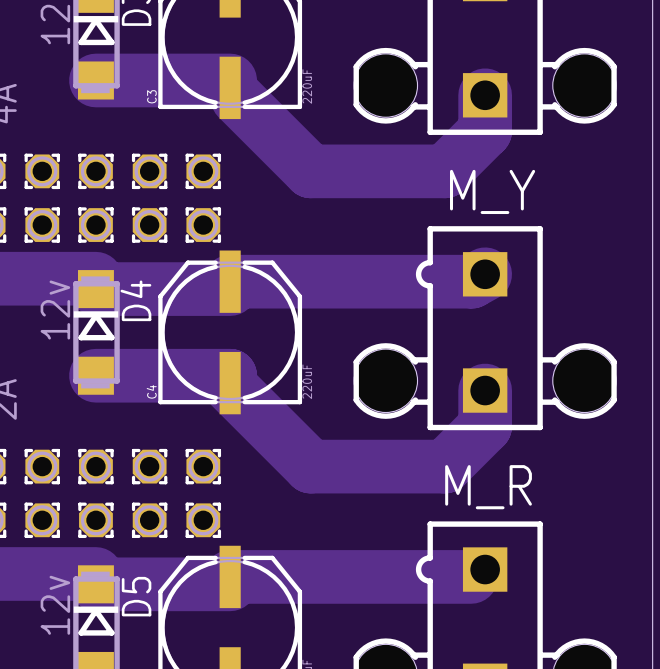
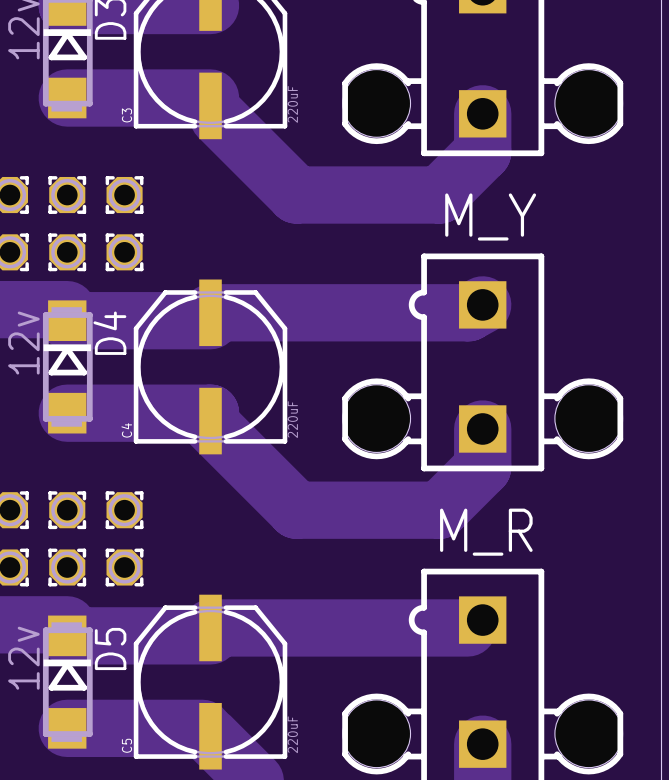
part: (203, 171) -> none
part: (203, 225) -> none
part: (203, 466) -> none
part: (203, 520) -> none

